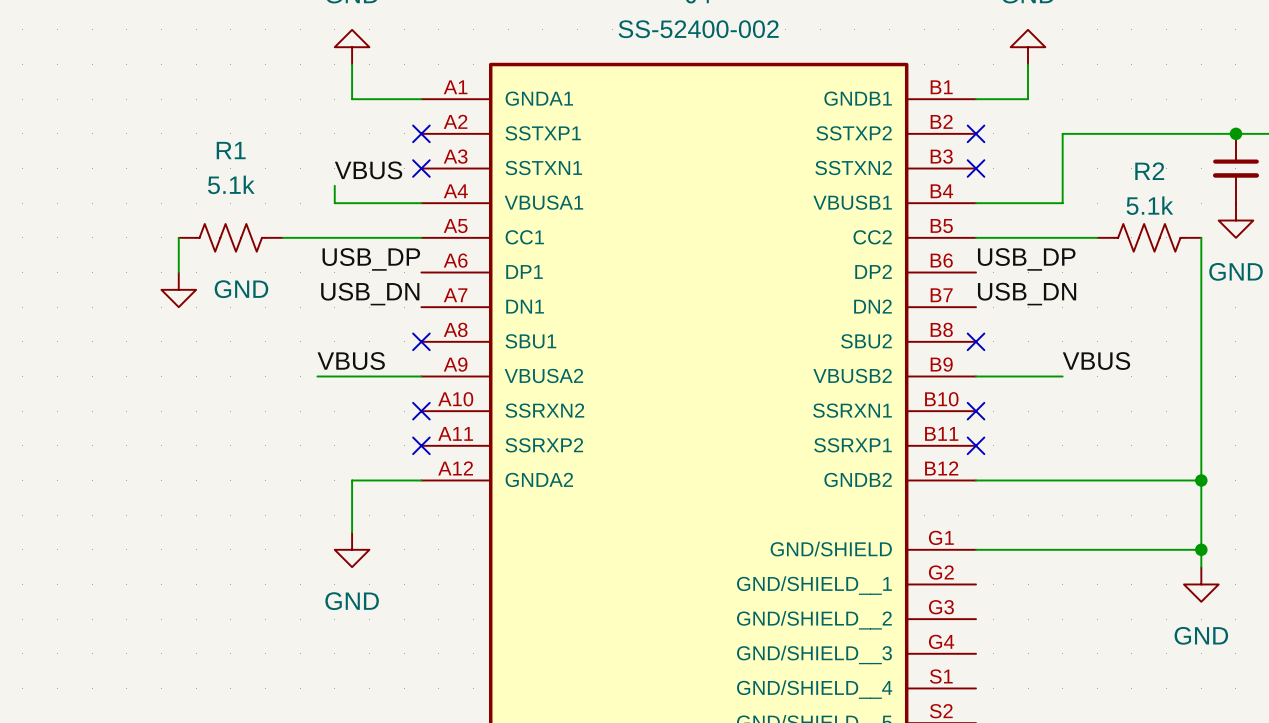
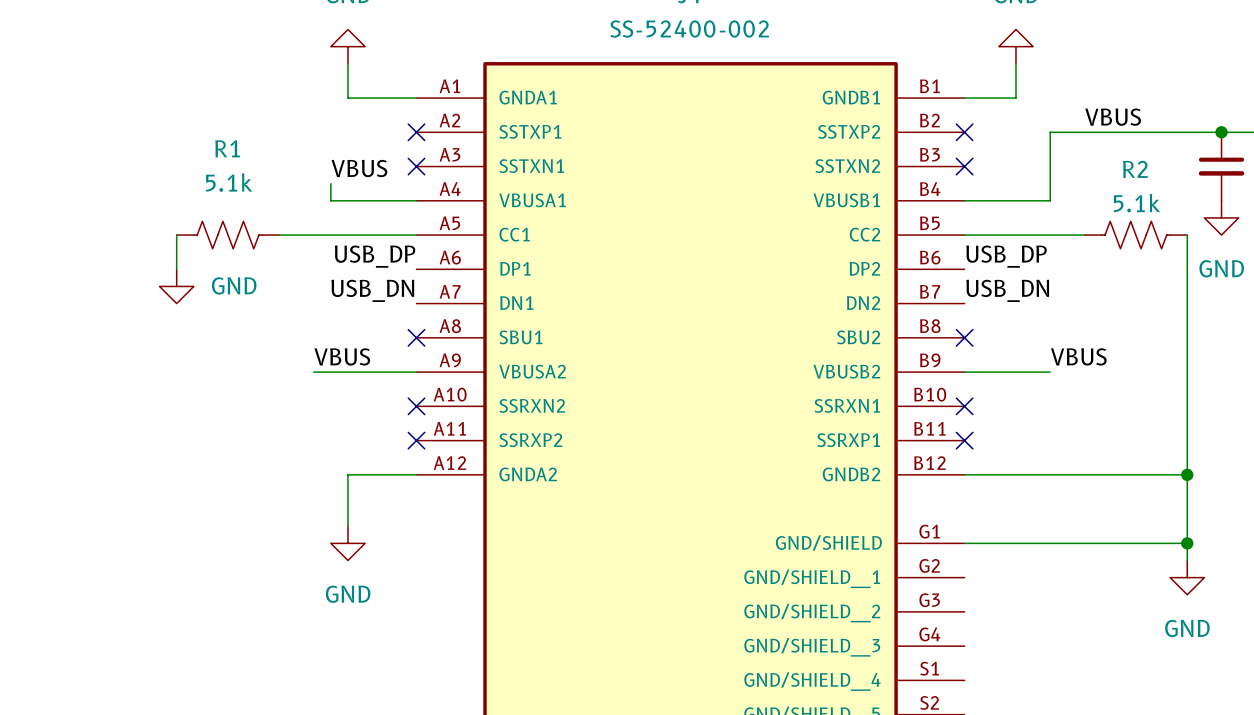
label: none -> VBUS (1113, 117)

